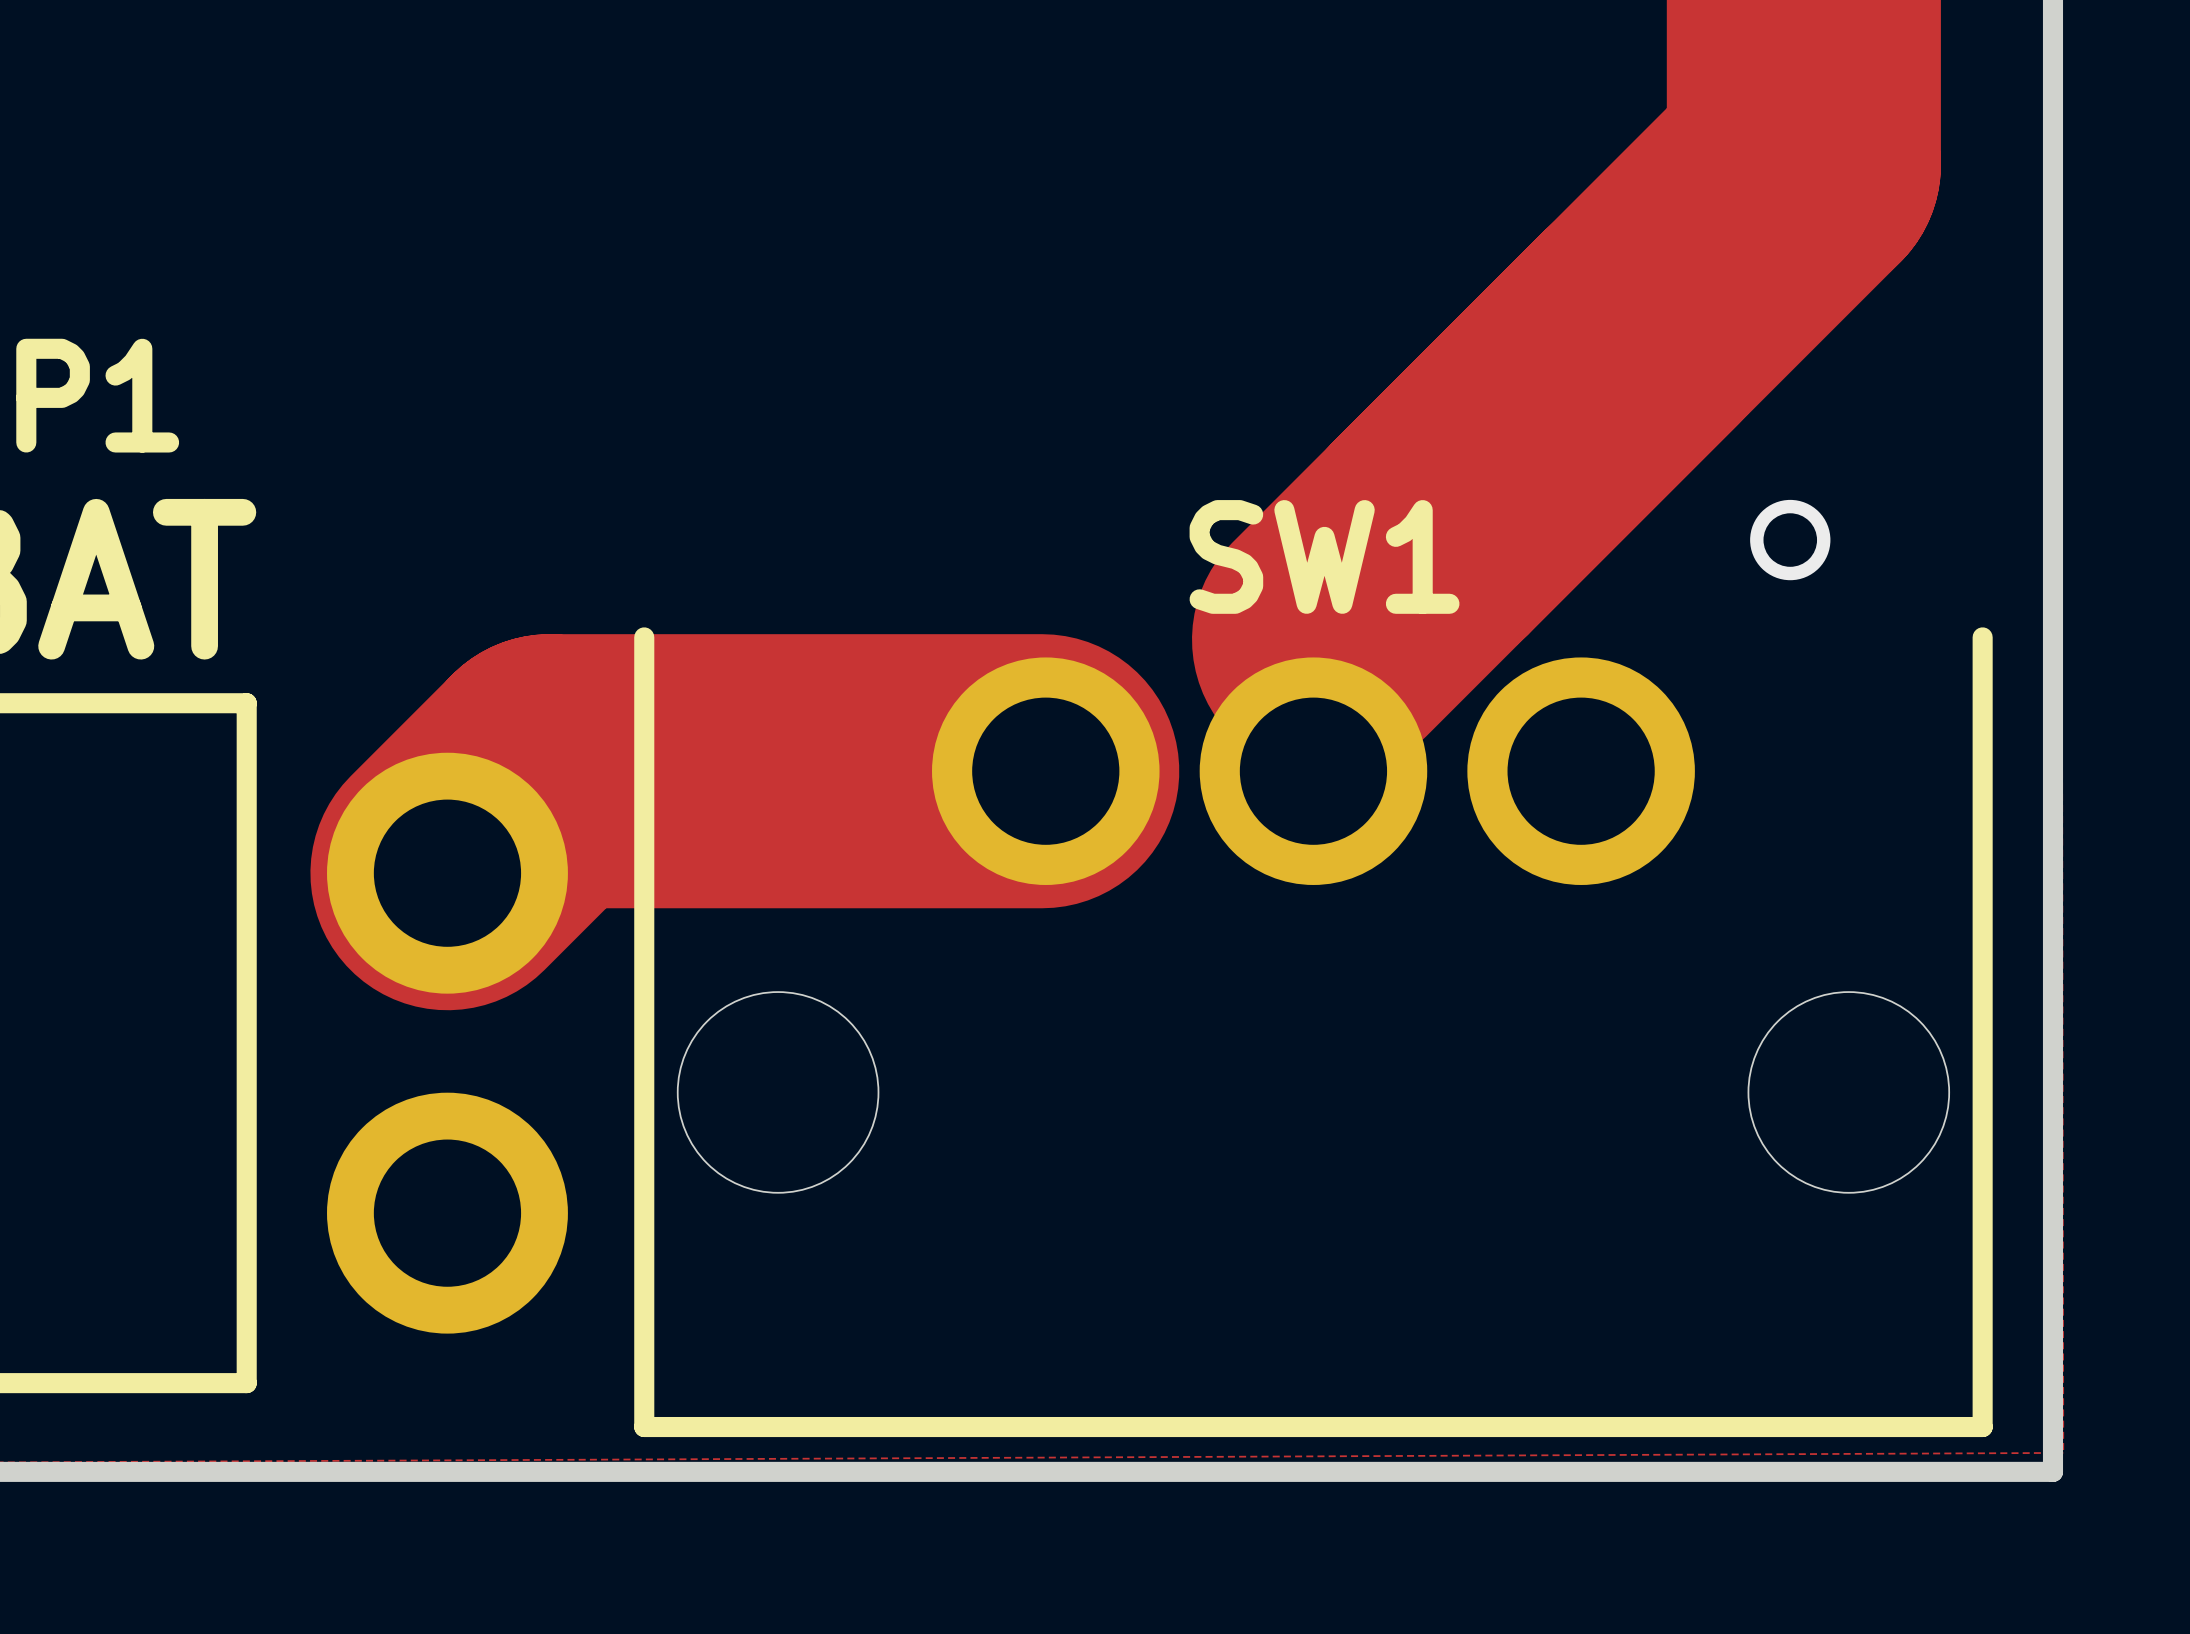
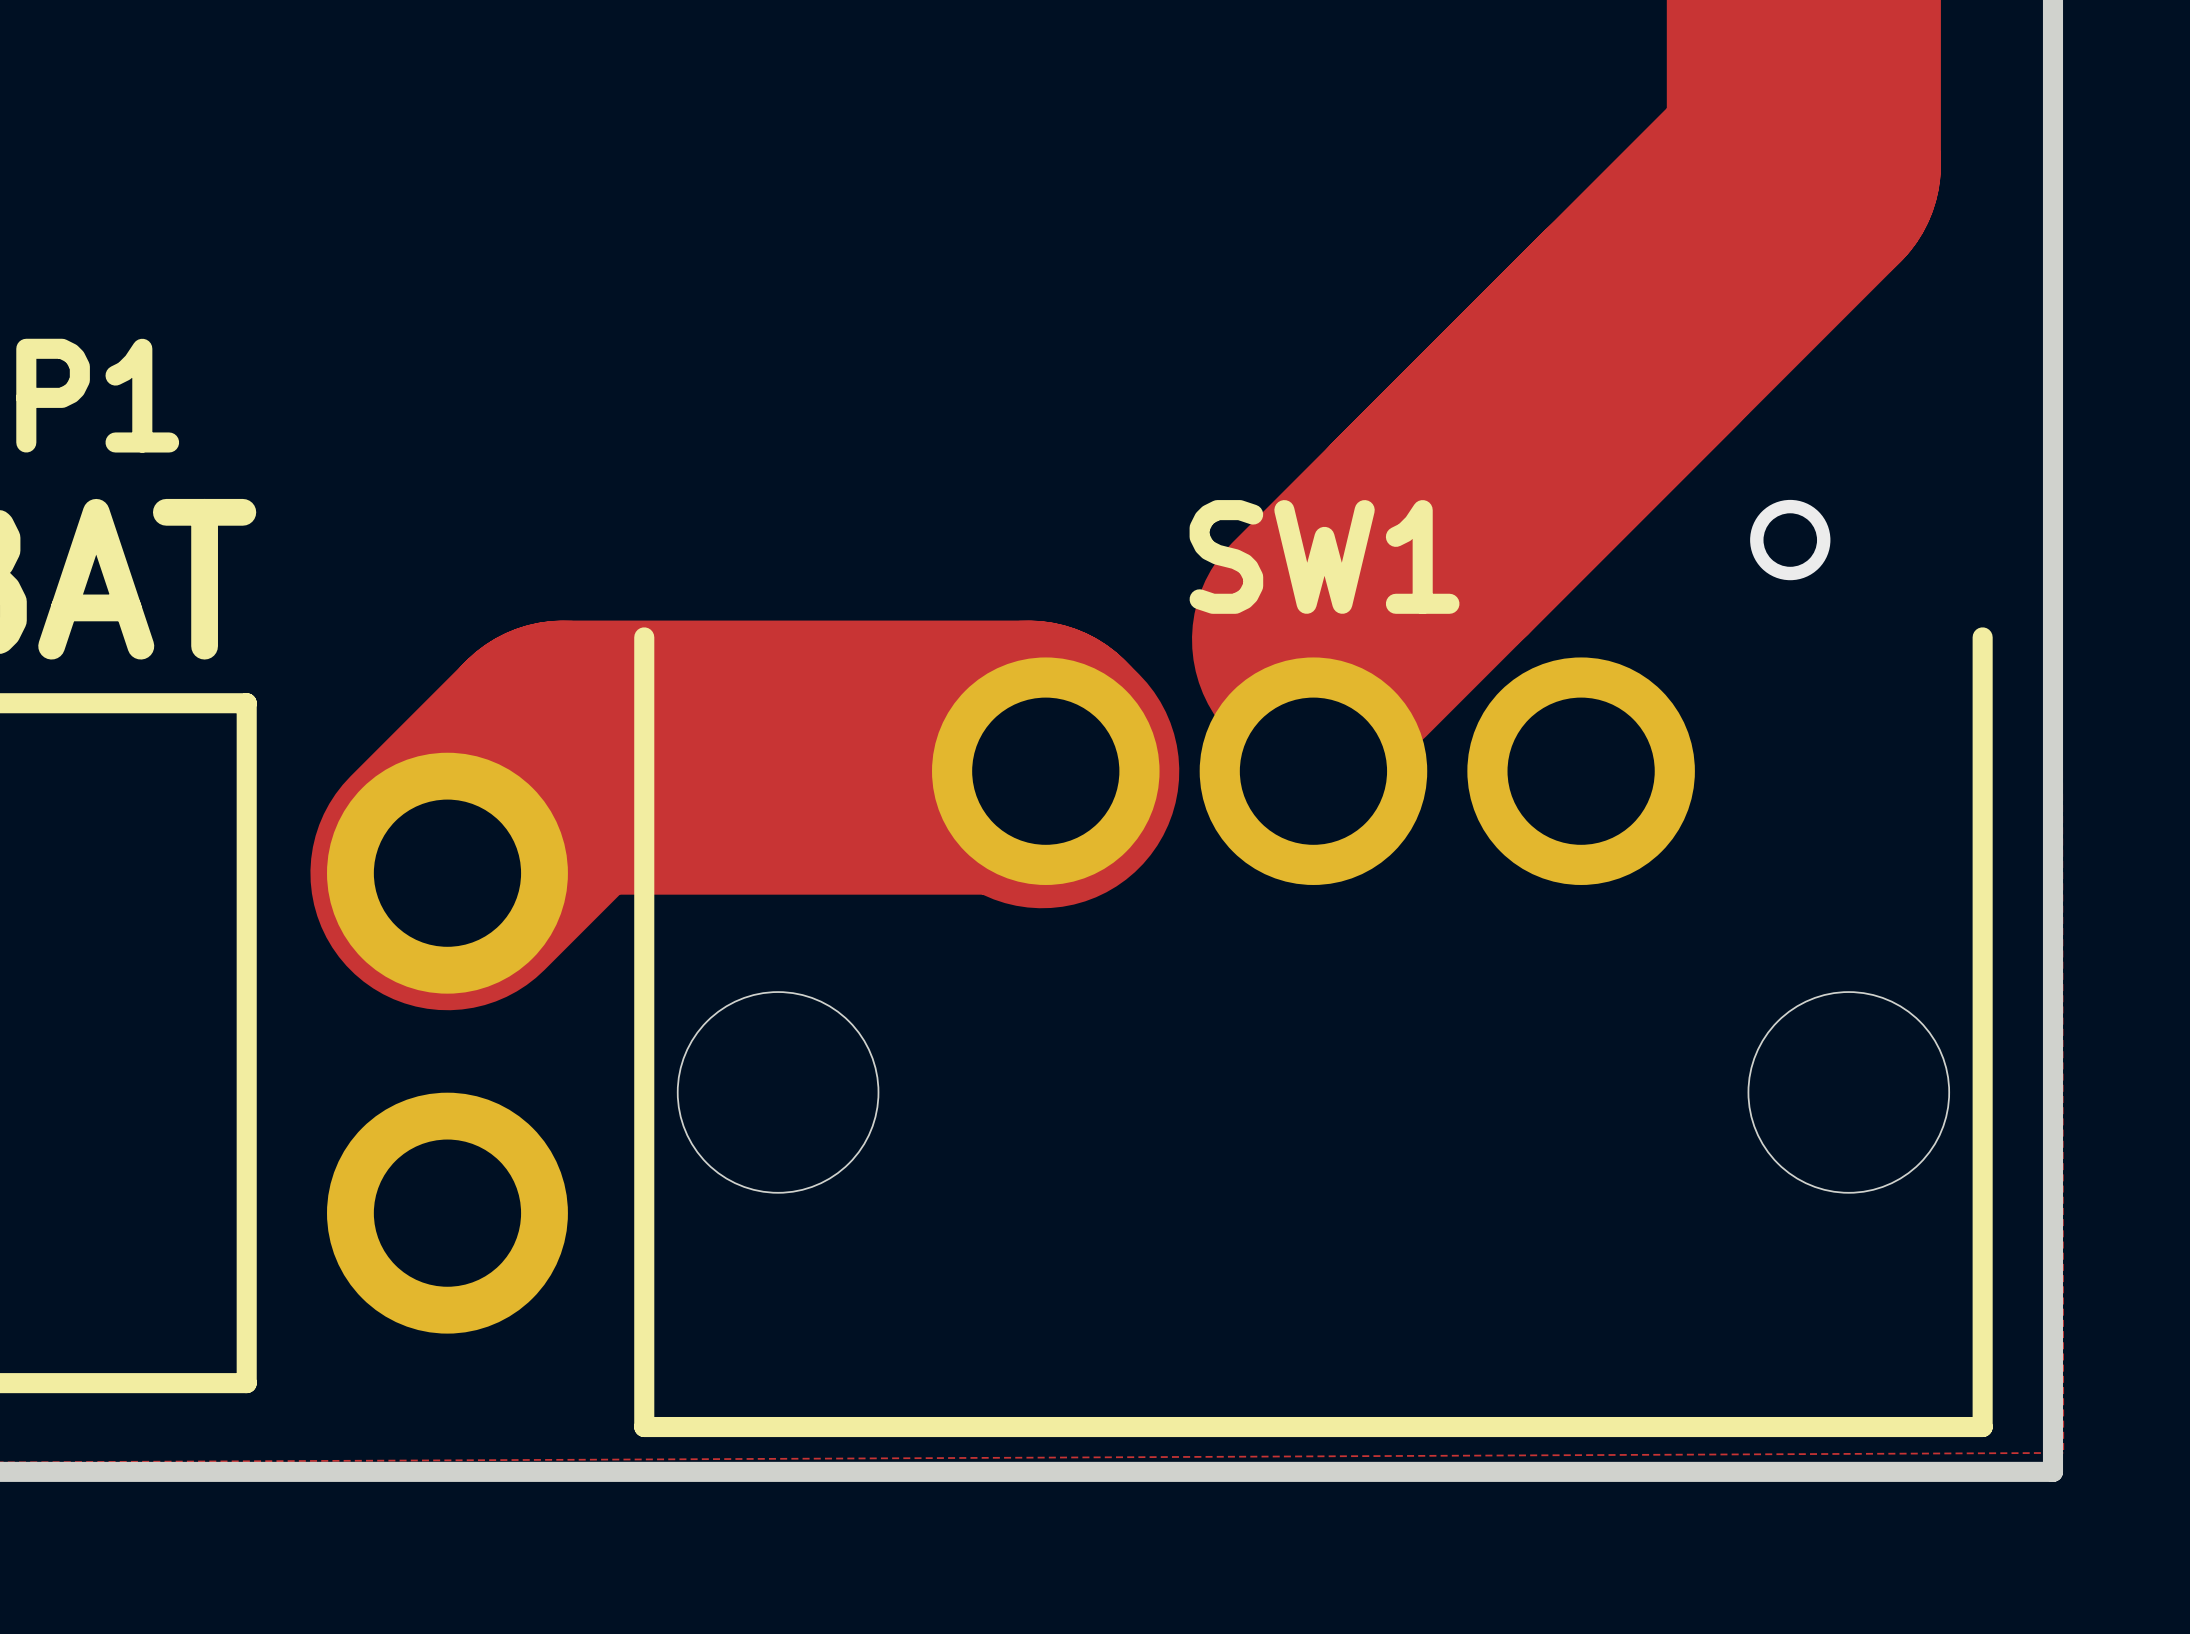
track: (549, 771) (1042, 771) -> (549, 771) (563, 757) (1028, 757) (1042, 771)

